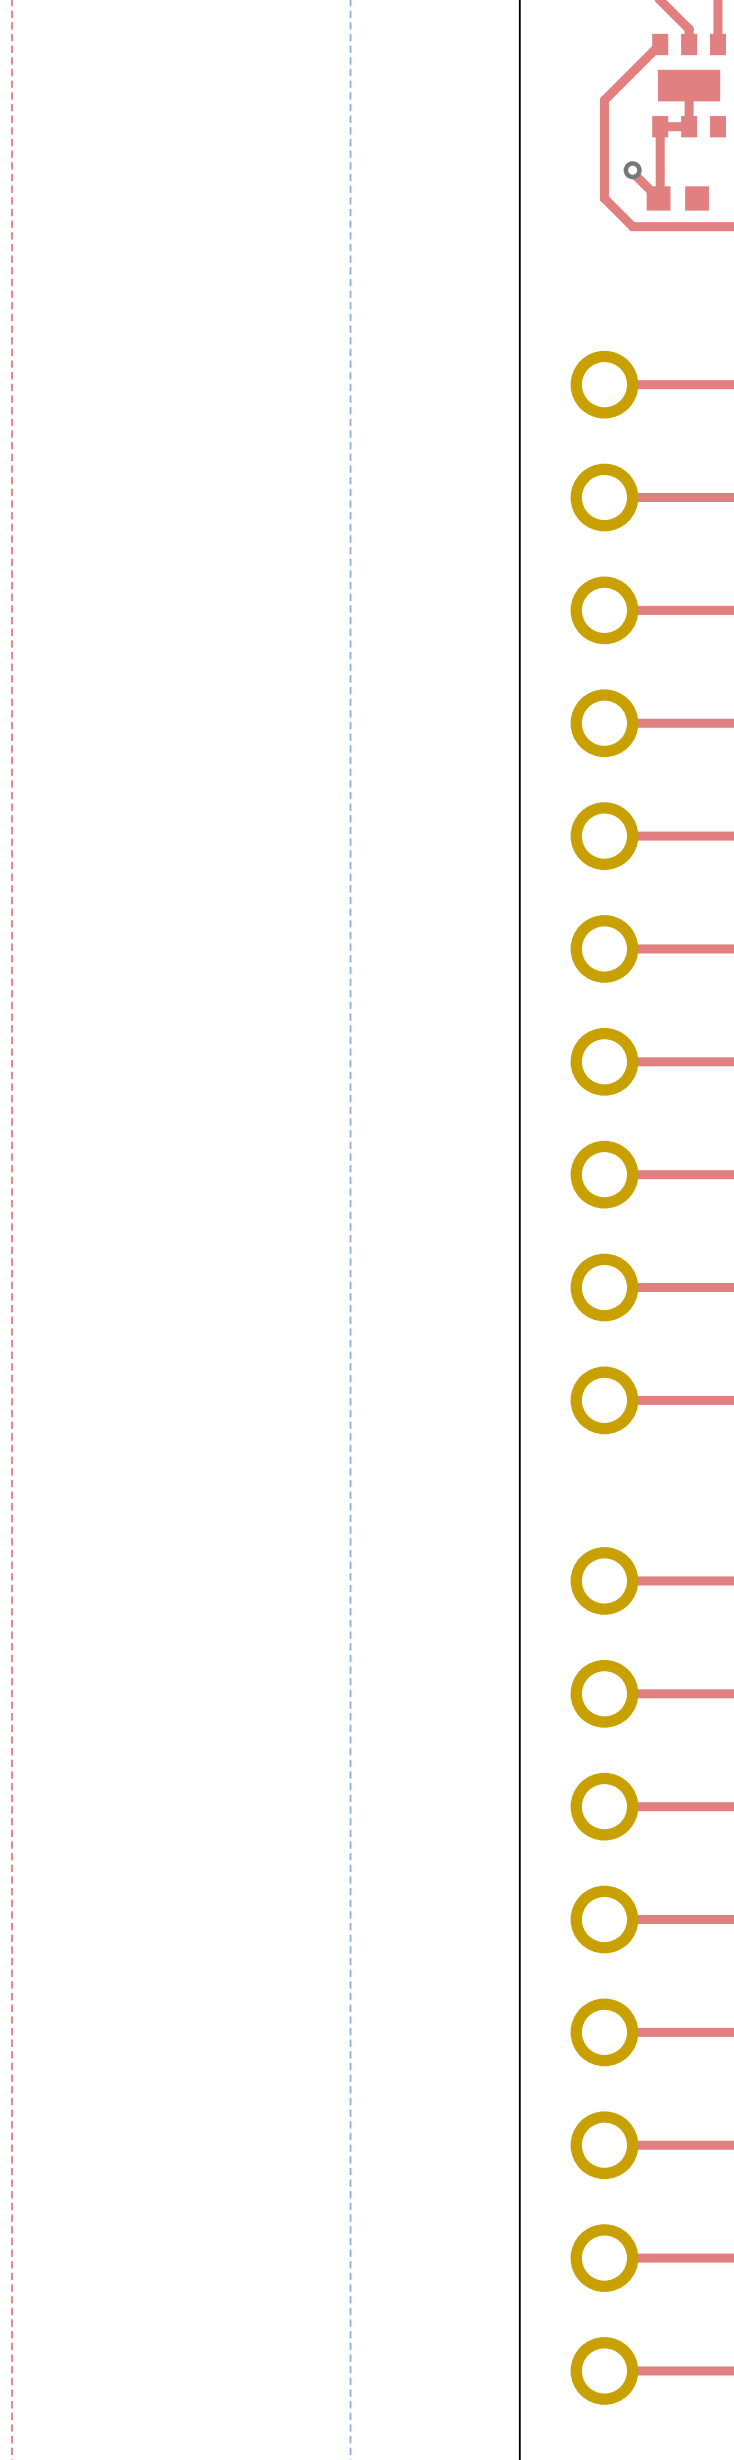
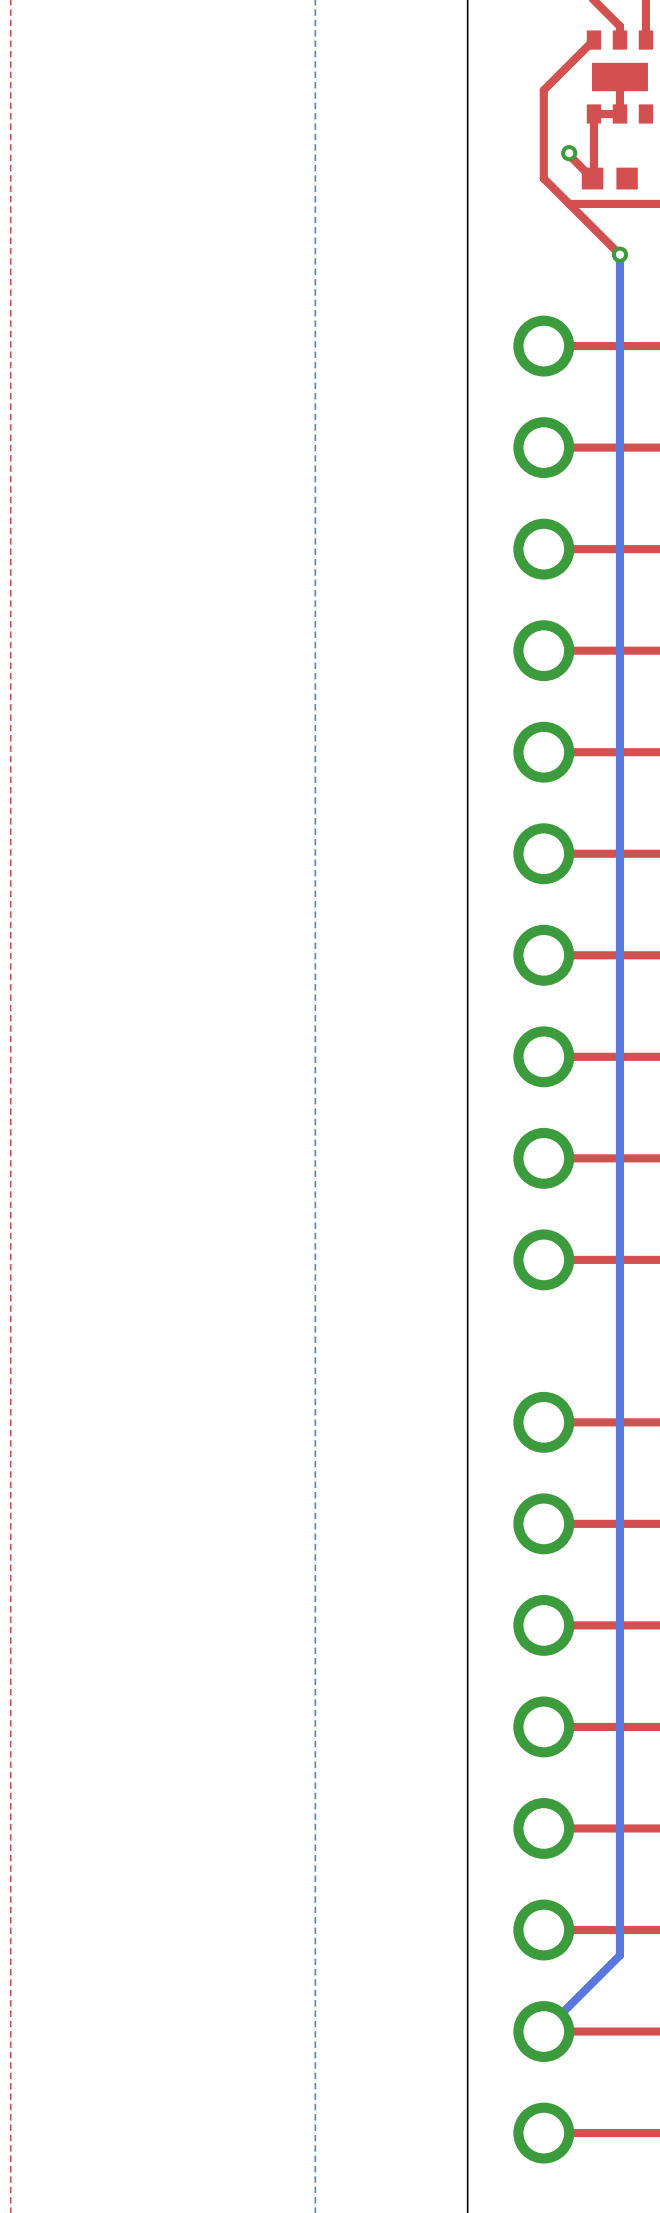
top track: none -> (569, 203) (619, 254)
bottom track: none -> (619, 254) (619, 1955) (543, 2031)
via: none -> (619, 254)

